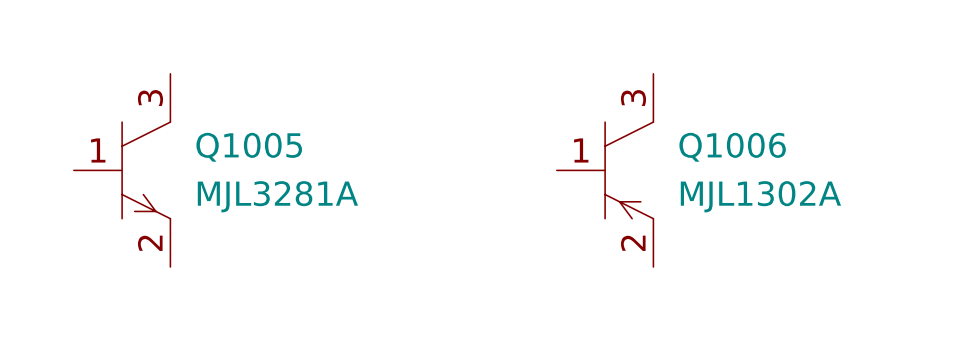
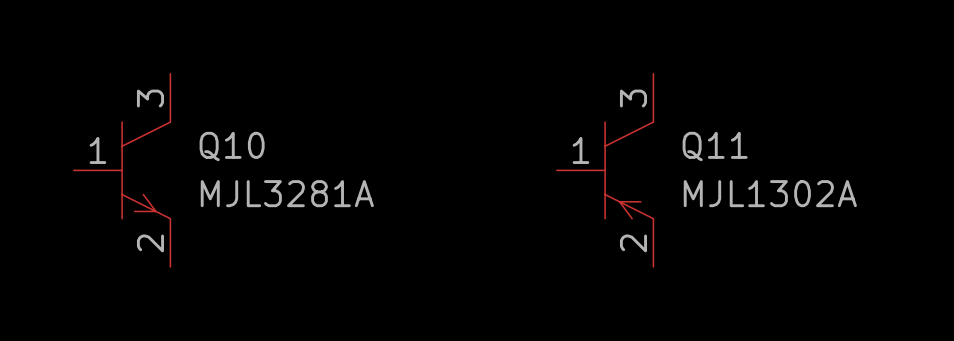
Q1005 name: Q1005 (249, 147) -> Q10 (232, 146)
Q1006 name: Q1006 (732, 147) -> Q11 (715, 146)

